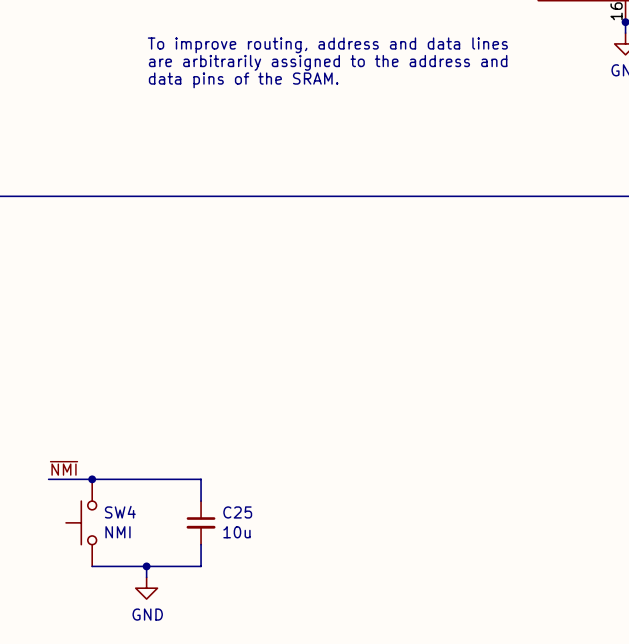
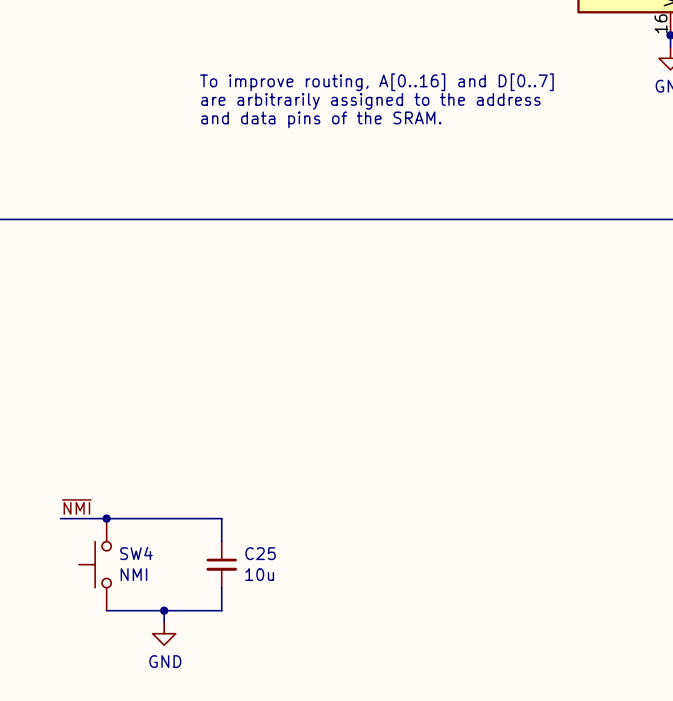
text: To improve routing, address and data lines (327, 45) -> To improve routing, A[0..16] and D[0..7] (376, 82)
text: are arbitrarily assigned to the address and (328, 62) -> are arbitrarily assigned to the address (370, 101)
text: data pins of the SRAM. (243, 80) -> and data pins of the SRAM. (321, 119)

